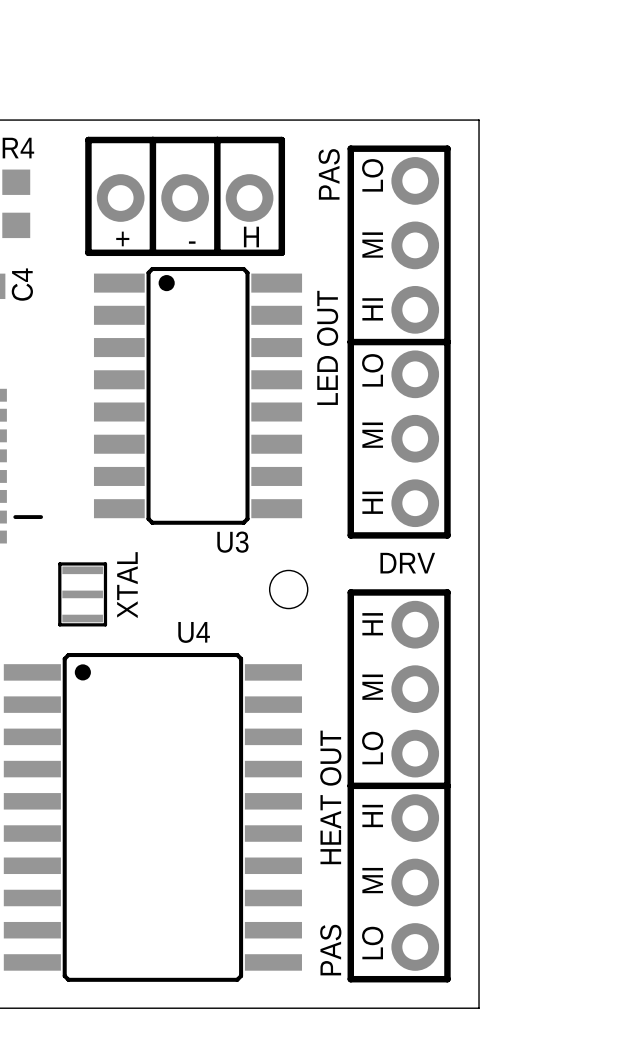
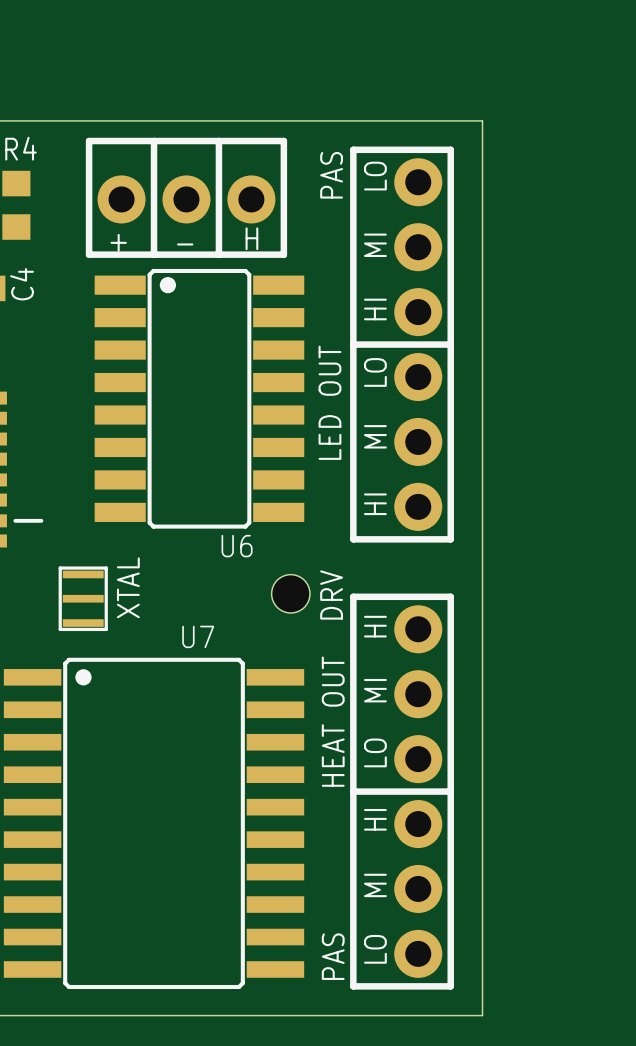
text position: LED OUT (327, 347) -> LED OUT (329, 402)
U3 name: U3 (232, 542) -> U6 (237, 546)
text rotation: 0° (407, 563) -> 90° counterclockwise (331, 594)
text position: DRV (407, 563) -> DRV (331, 594)
U4 name: U4 (194, 632) -> U7 (198, 636)
text position: HEAT OUT (330, 797) -> HEAT OUT (333, 721)

